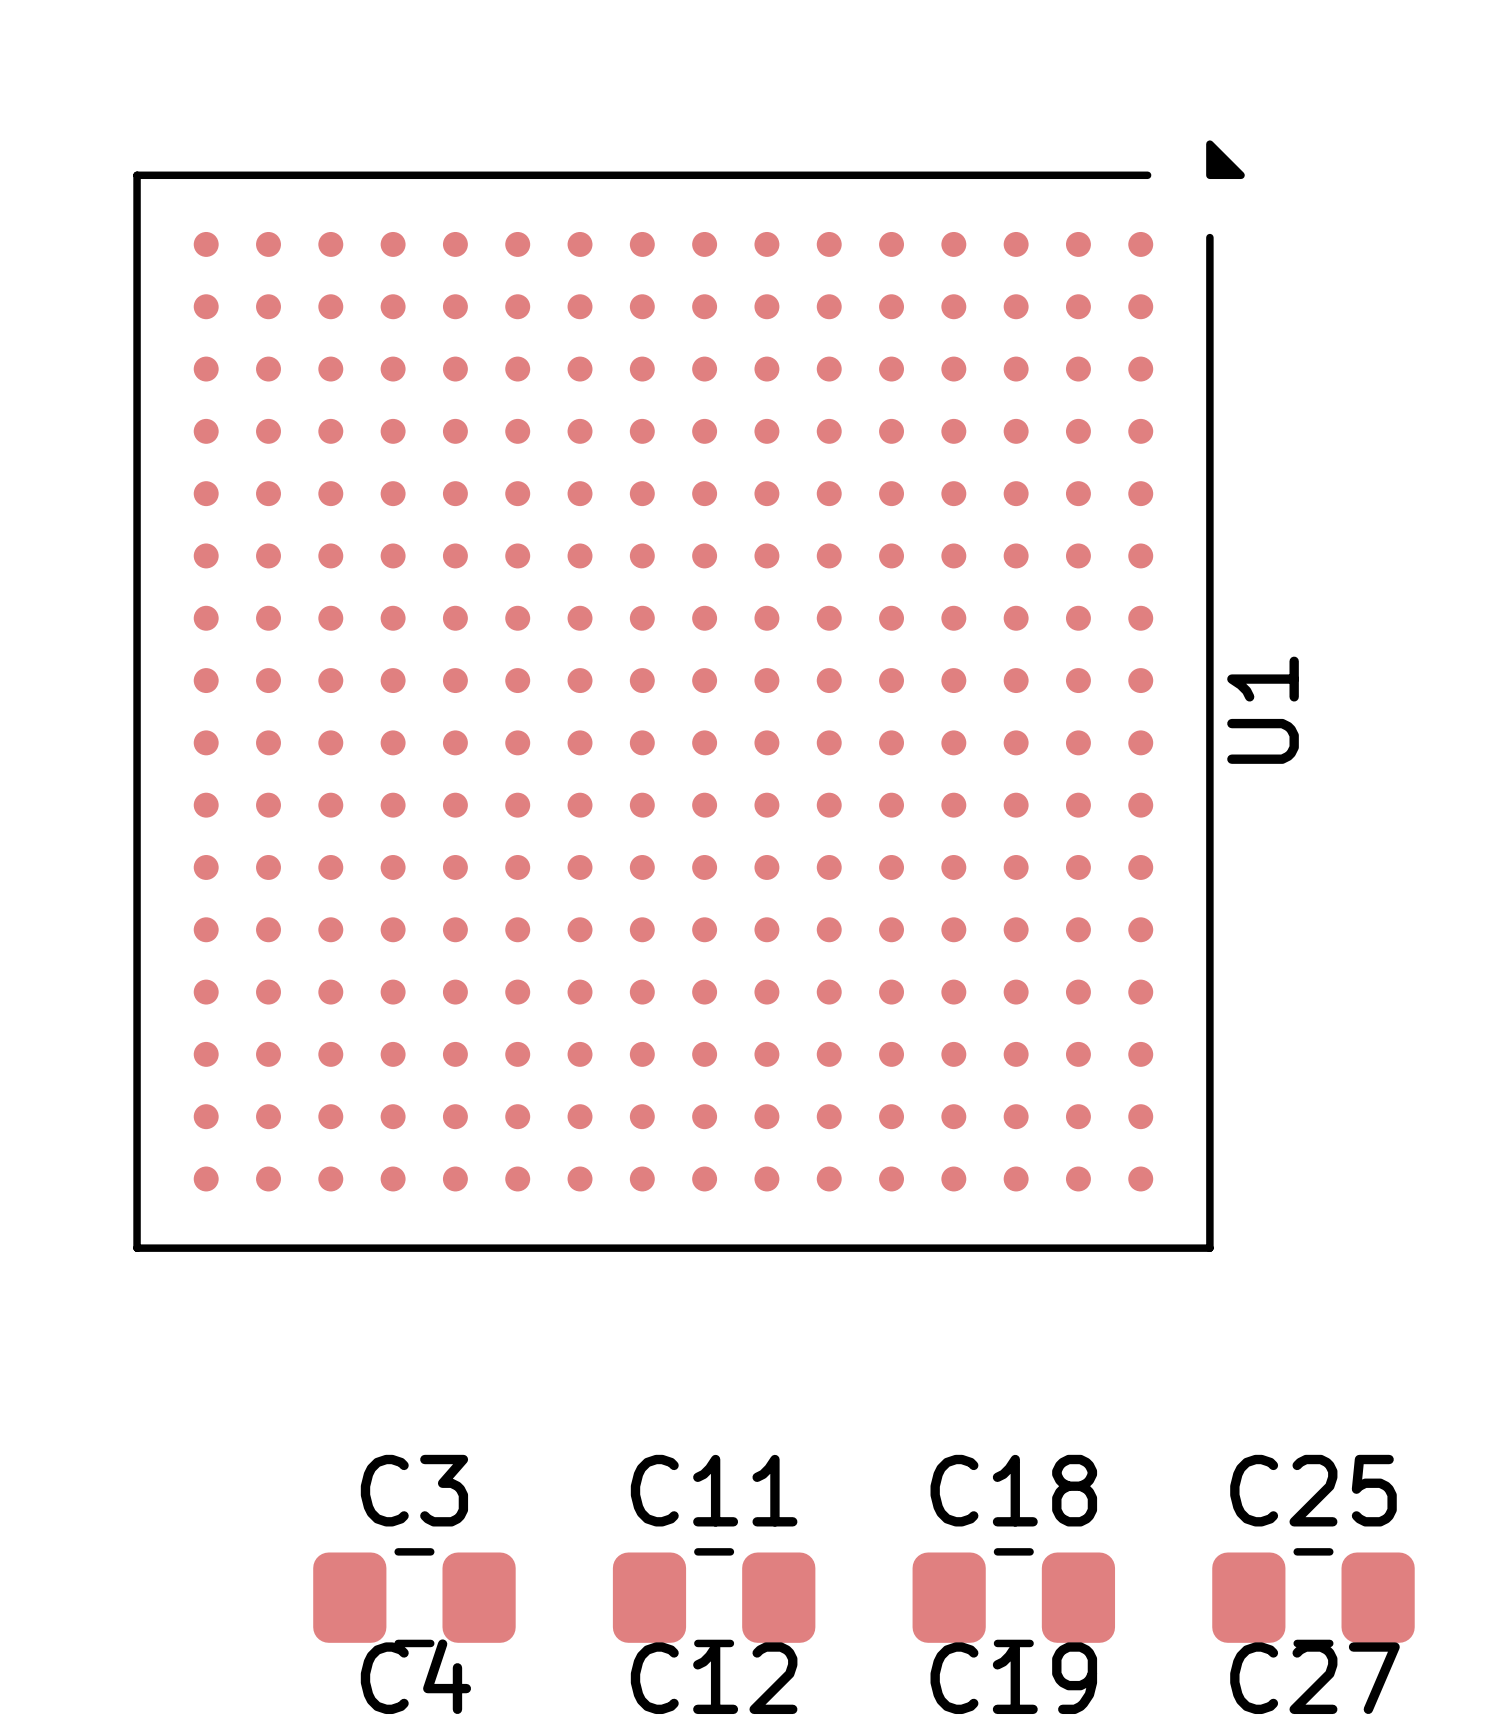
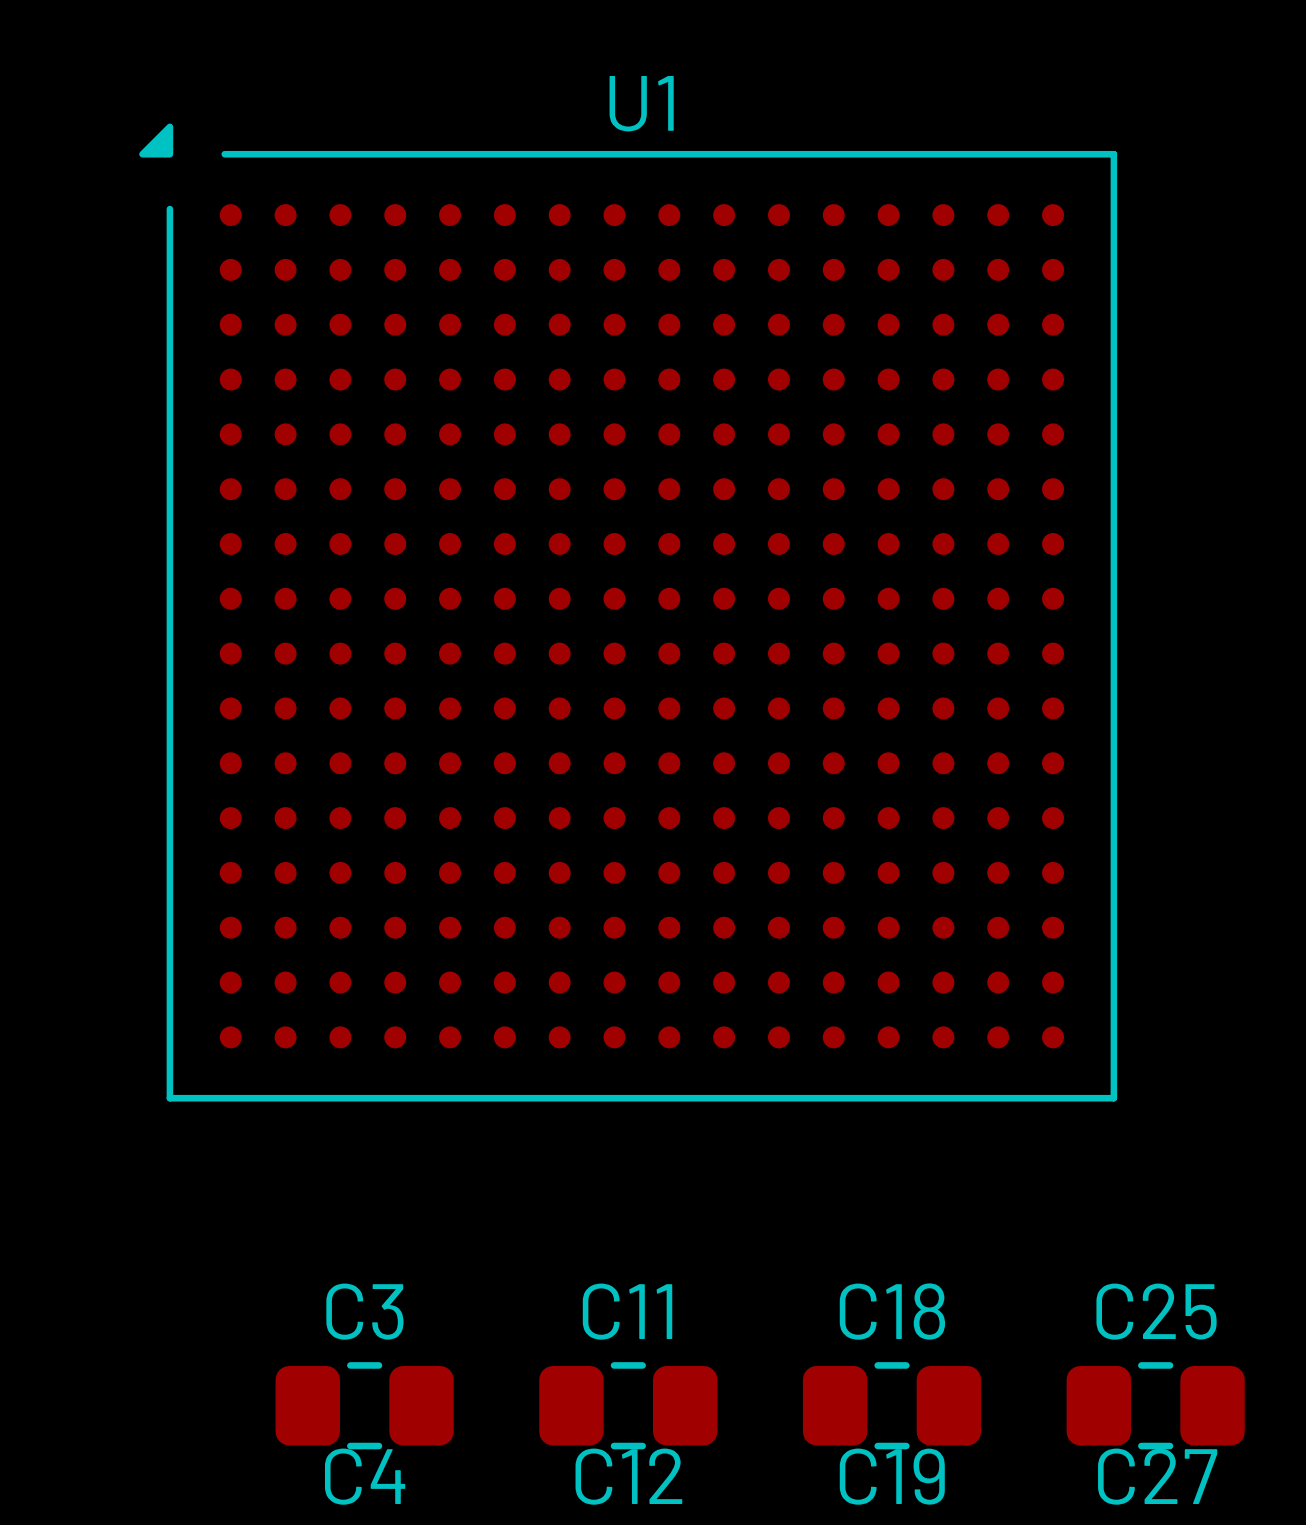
U1 rotation: 0° (689, 696) -> 90° counterclockwise (628, 612)

